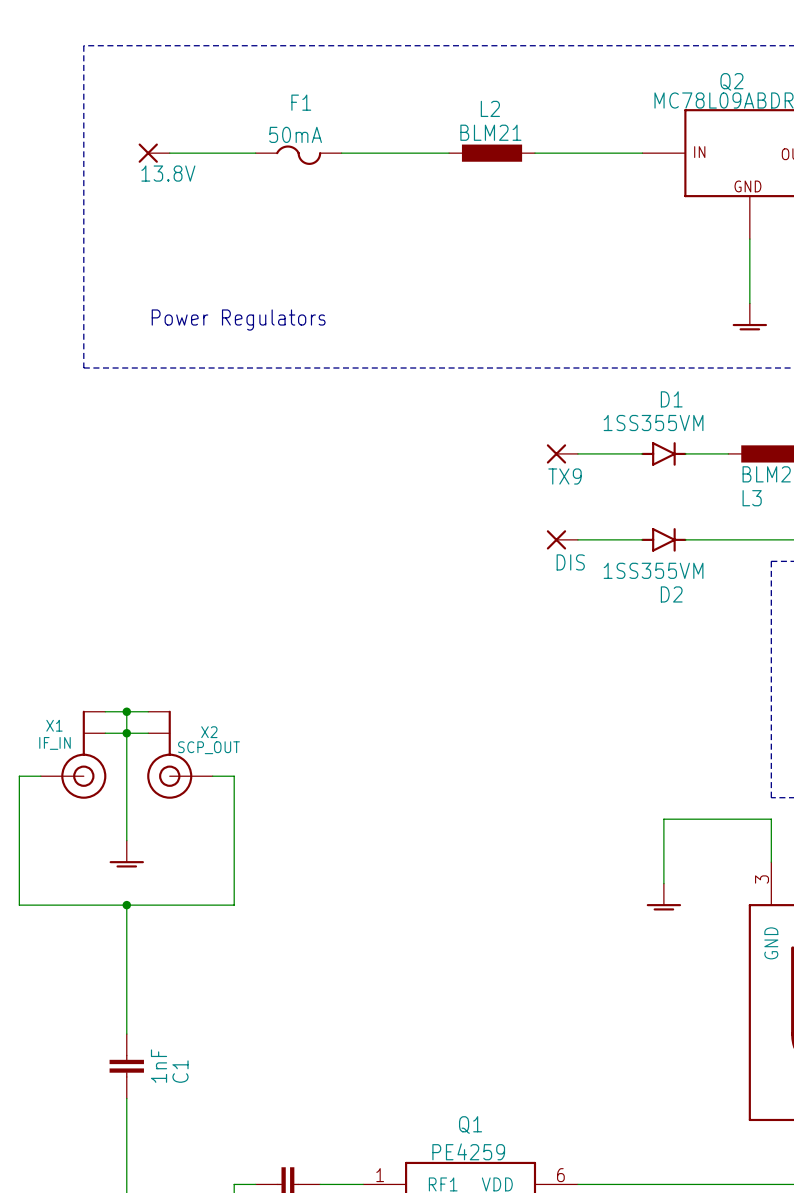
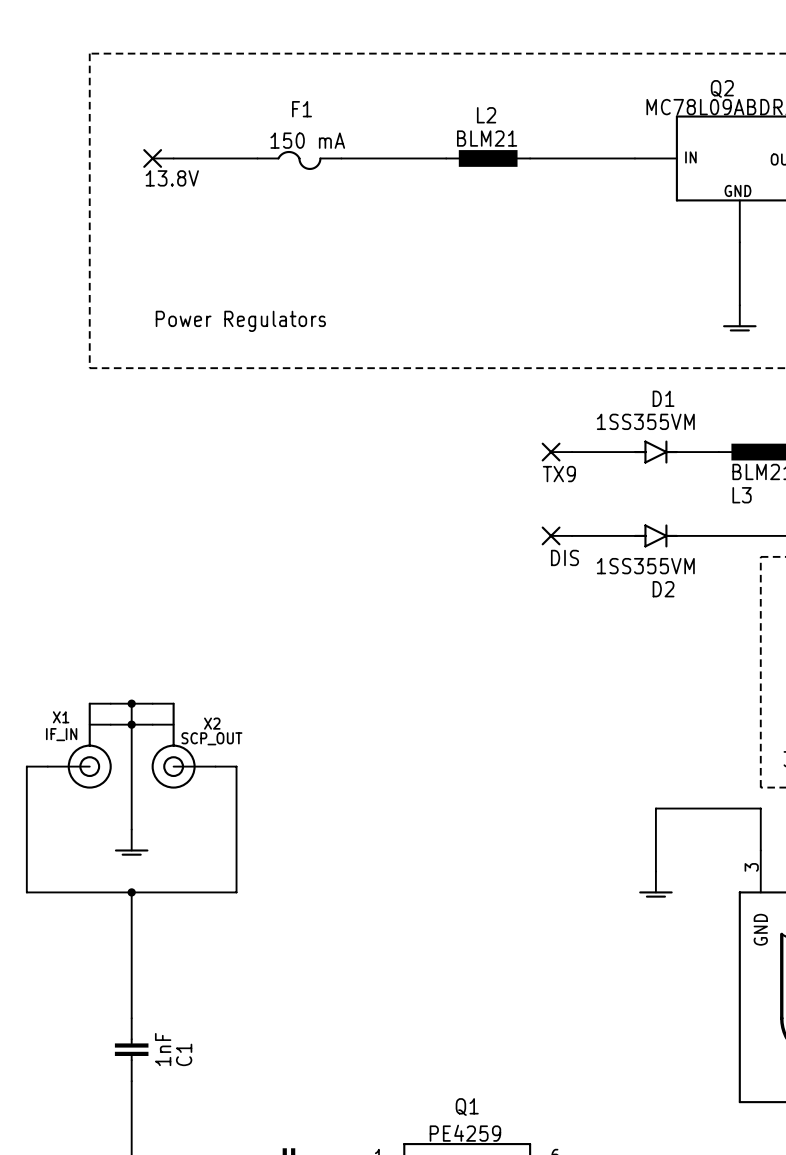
F1 value: 50mA (295, 134) -> 150 mA (307, 140)

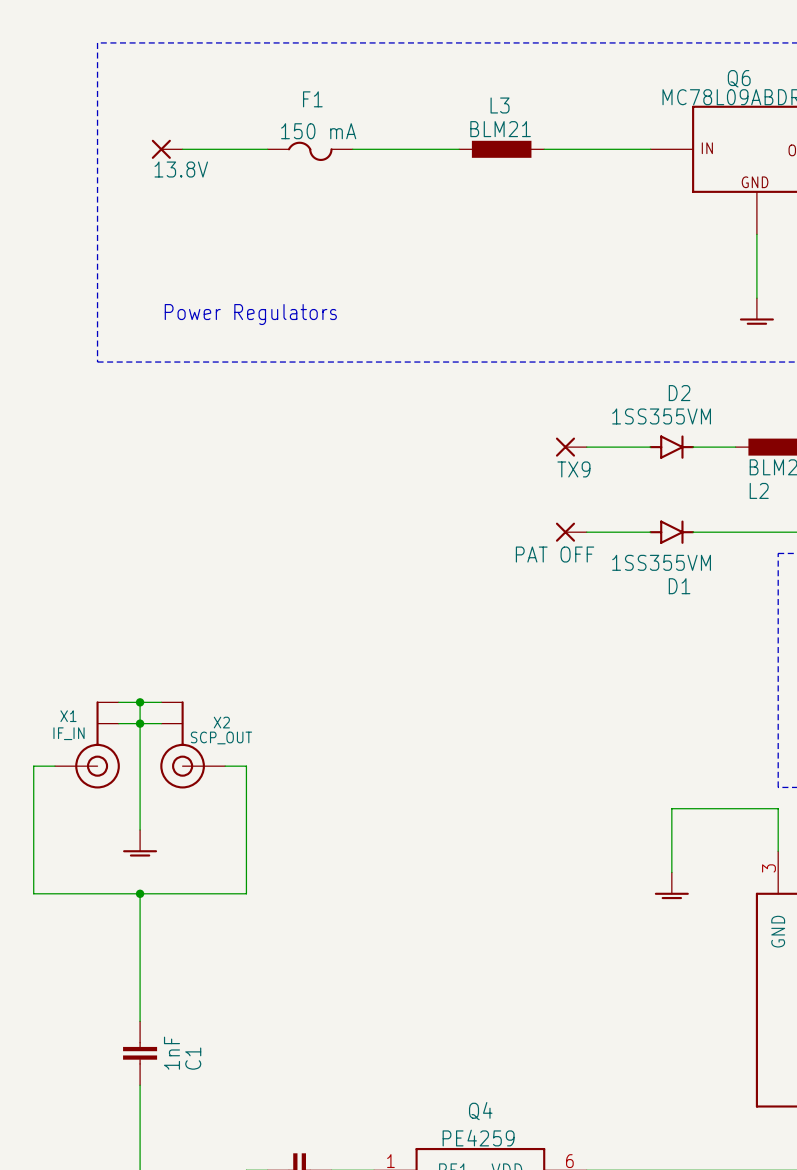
Q2 name: Q2 (722, 88) -> Q6 (739, 78)
L2 name: L2 (486, 115) -> L3 (500, 105)
D1 name: D1 (663, 398) -> D2 (679, 393)
L3 name: L3 (742, 495) -> L2 (759, 490)
part value: DIS (564, 557) -> PAT OFF (555, 554)
D2 name: D2 (663, 589) -> D1 (679, 586)
Q1 name: Q1 (467, 1107) -> Q4 (480, 1111)

